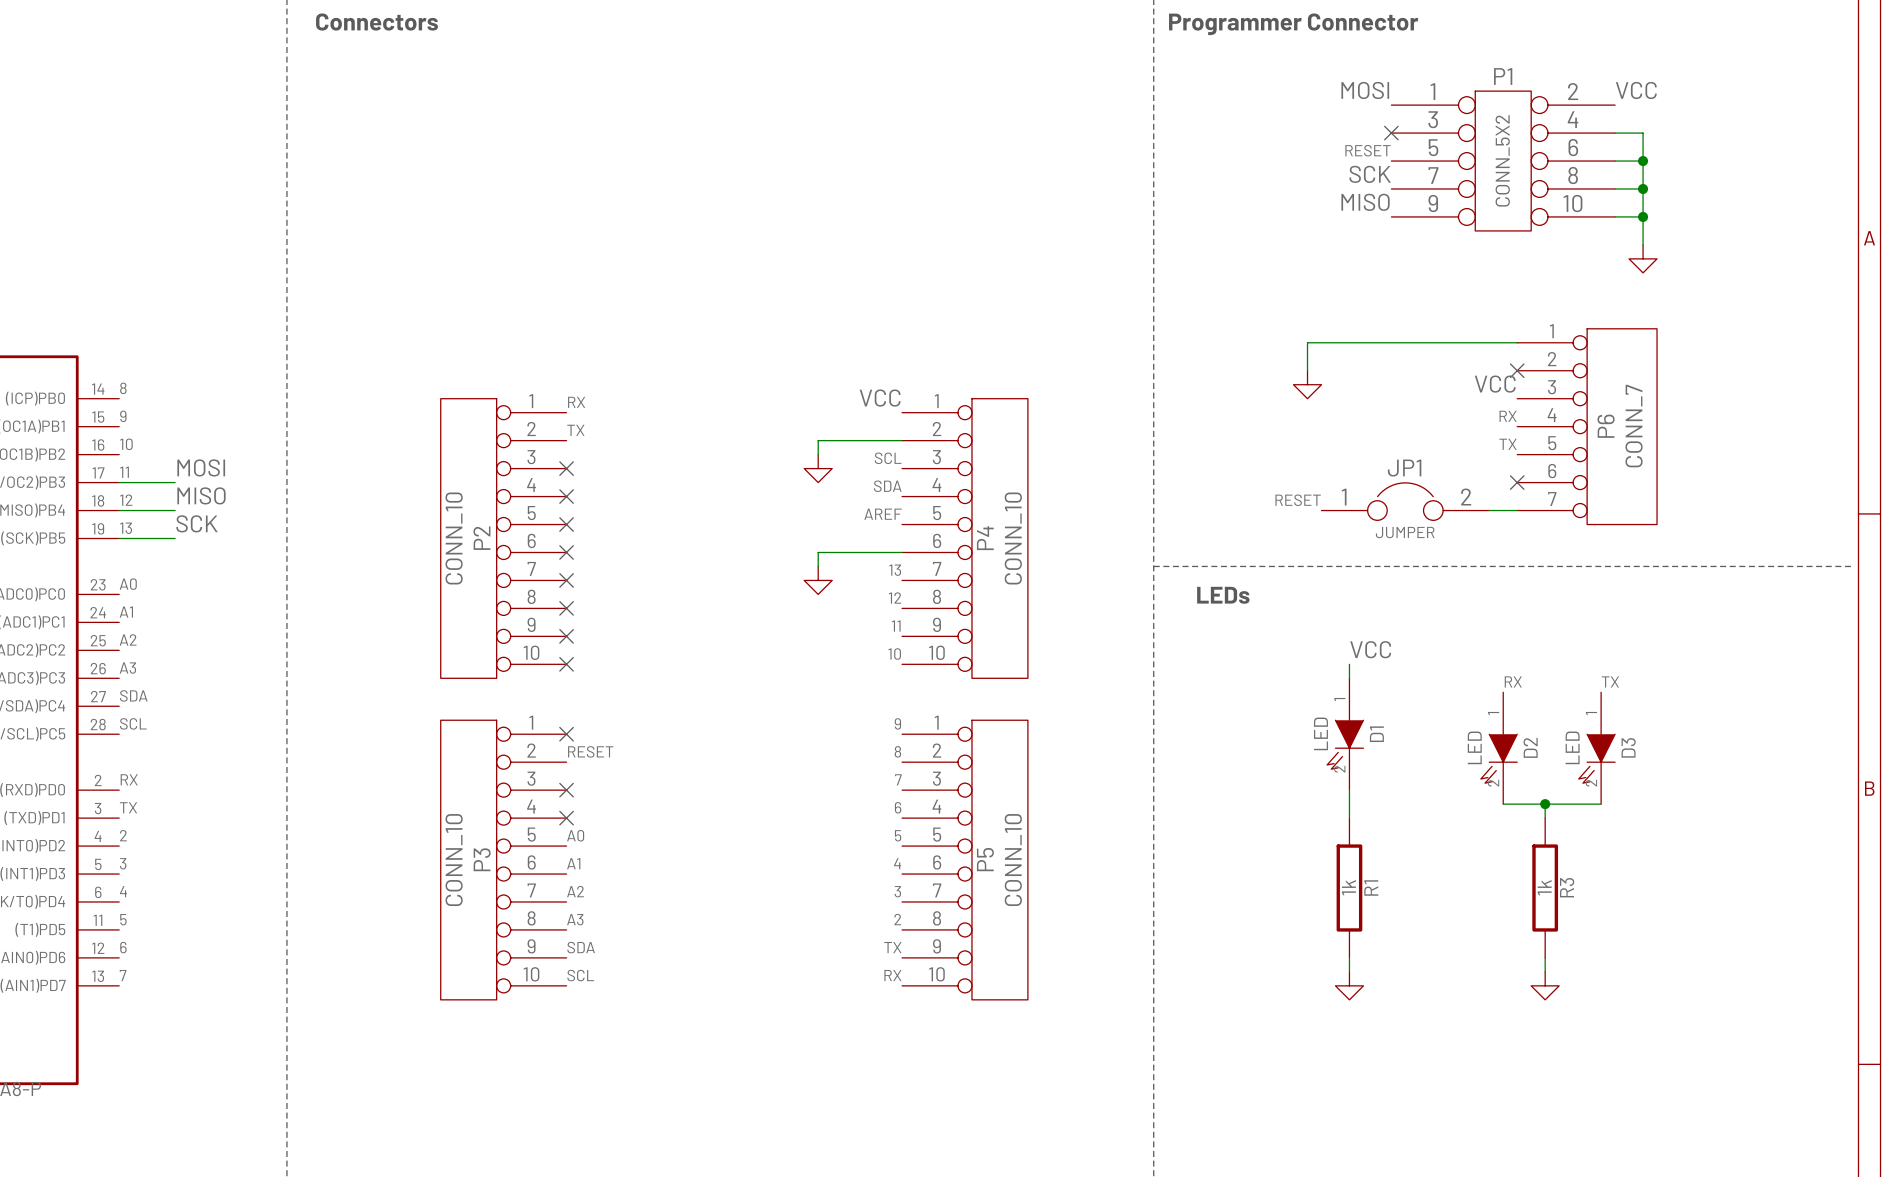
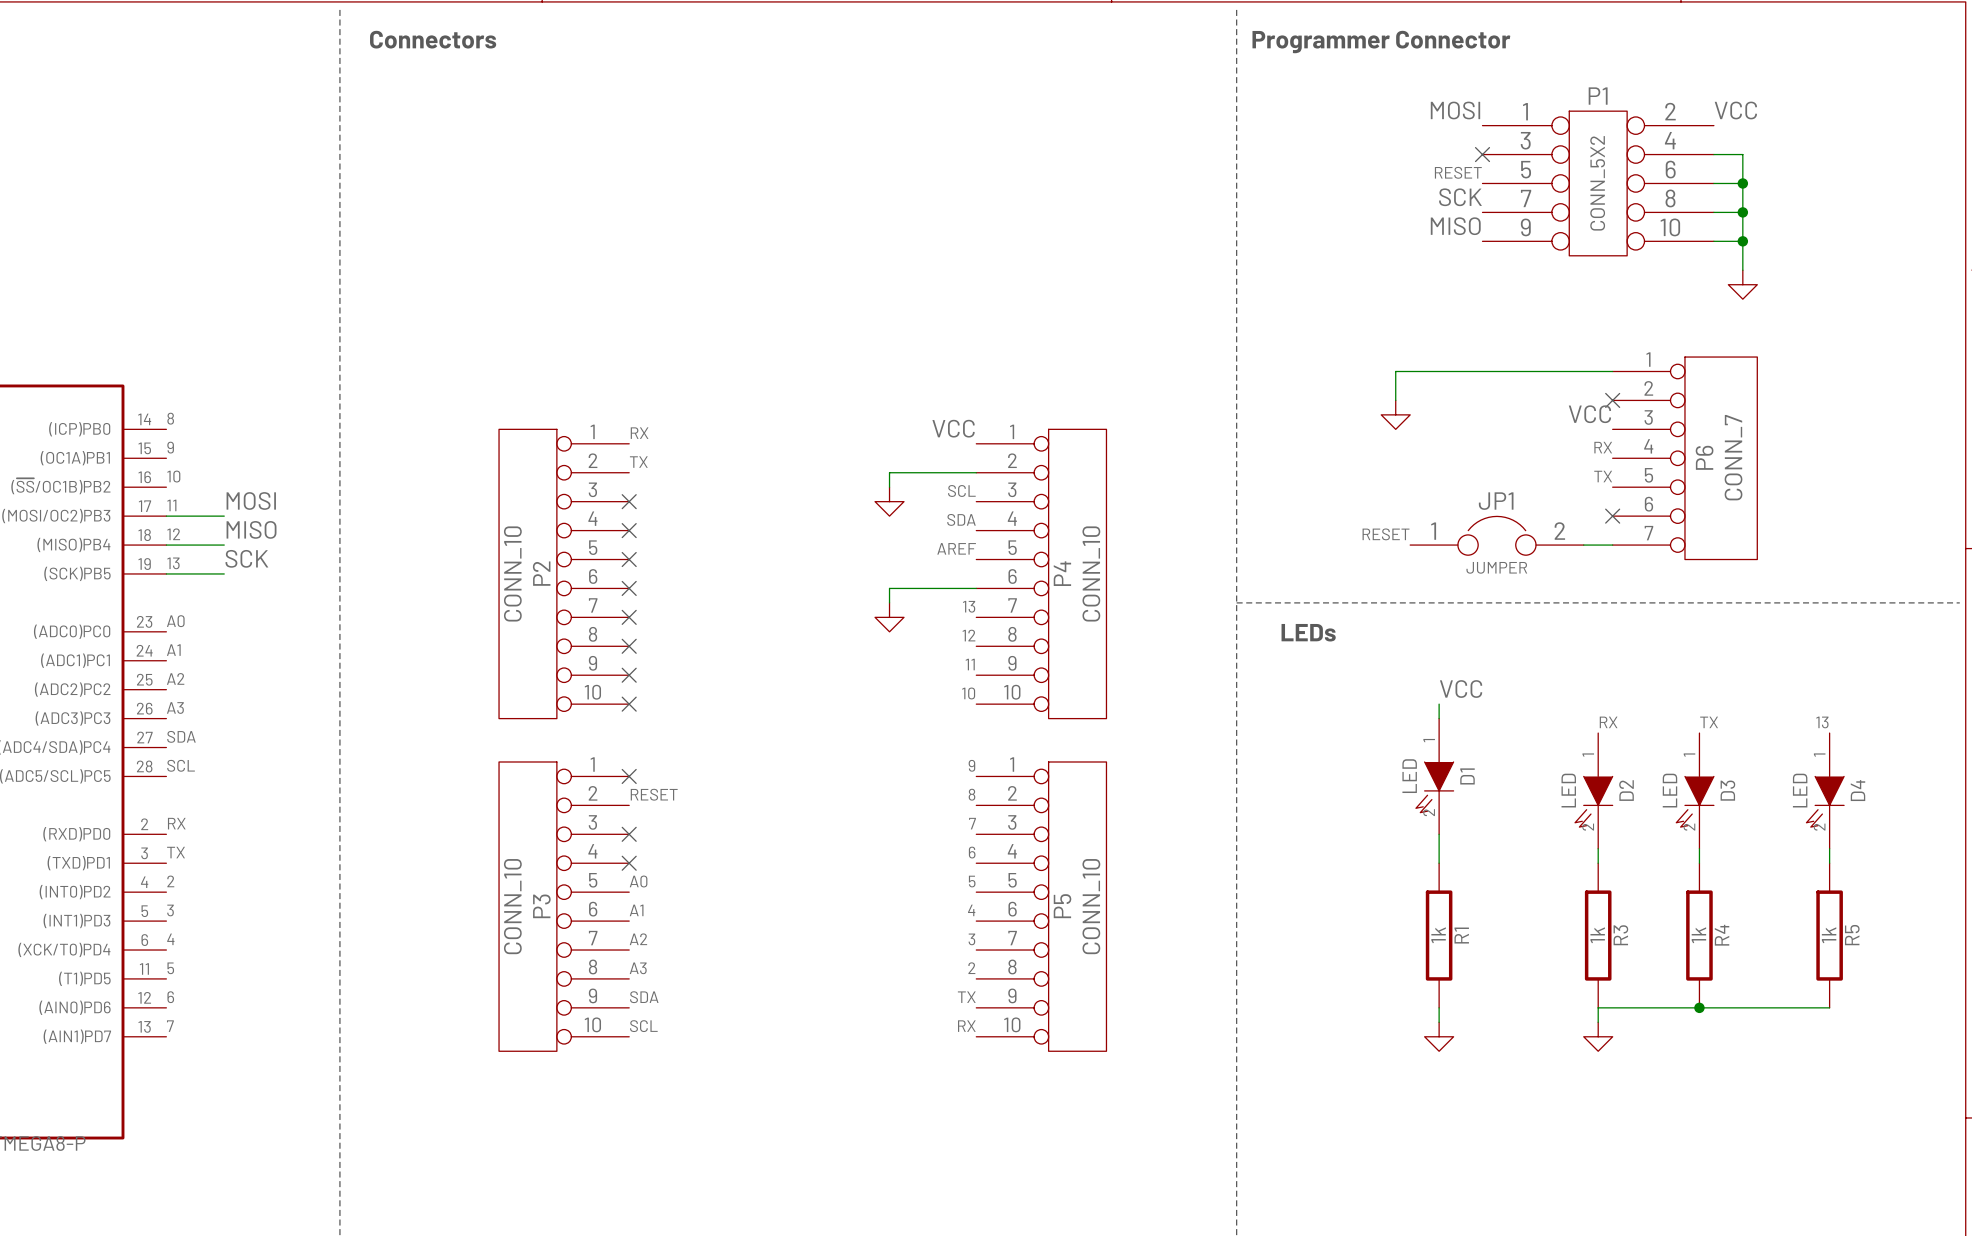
label: none -> 13 (1822, 722)
D4: none -> LED (1825, 790)
wire: (1503, 804) (1601, 804) -> (1598, 848) (1598, 863)
wire: (1545, 804) (1545, 818) -> (1699, 848) (1699, 863)
junction: (1545, 804) -> none
R3 position: (1545, 888) -> (1598, 935)
R4: none -> 1k (1699, 935)
R5: none -> 1k (1829, 935)
wire: (1545, 957) (1545, 971) -> (1829, 848) (1829, 863)
junction: none -> (1699, 1007)
wire: none -> (1829, 1007) (1598, 1007) (1598, 1022)
power symbol position: (1545, 985) -> (1598, 1036)

